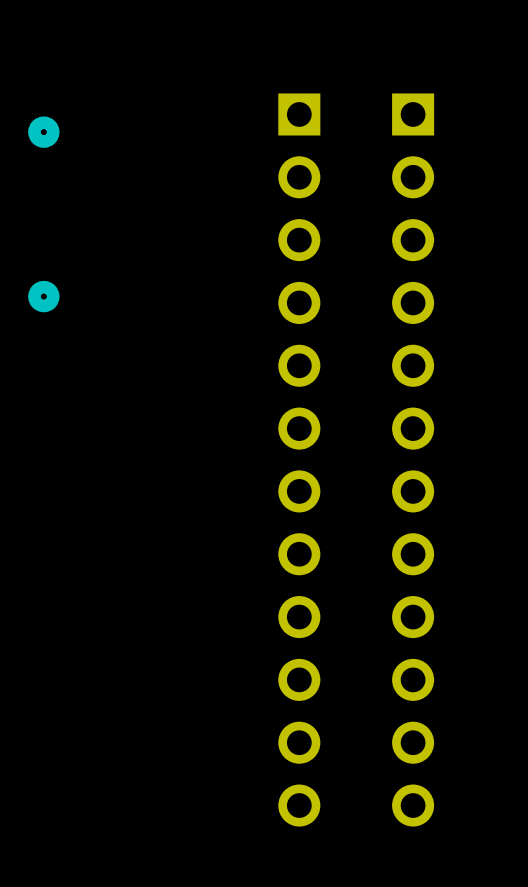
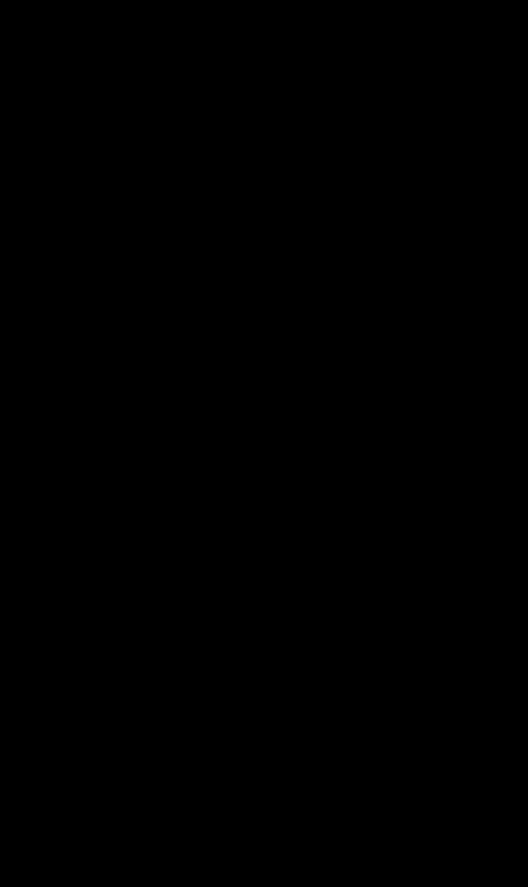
part: (43, 132) -> none
part: (43, 296) -> none
part: (299, 460) -> none
part: (413, 460) -> none

